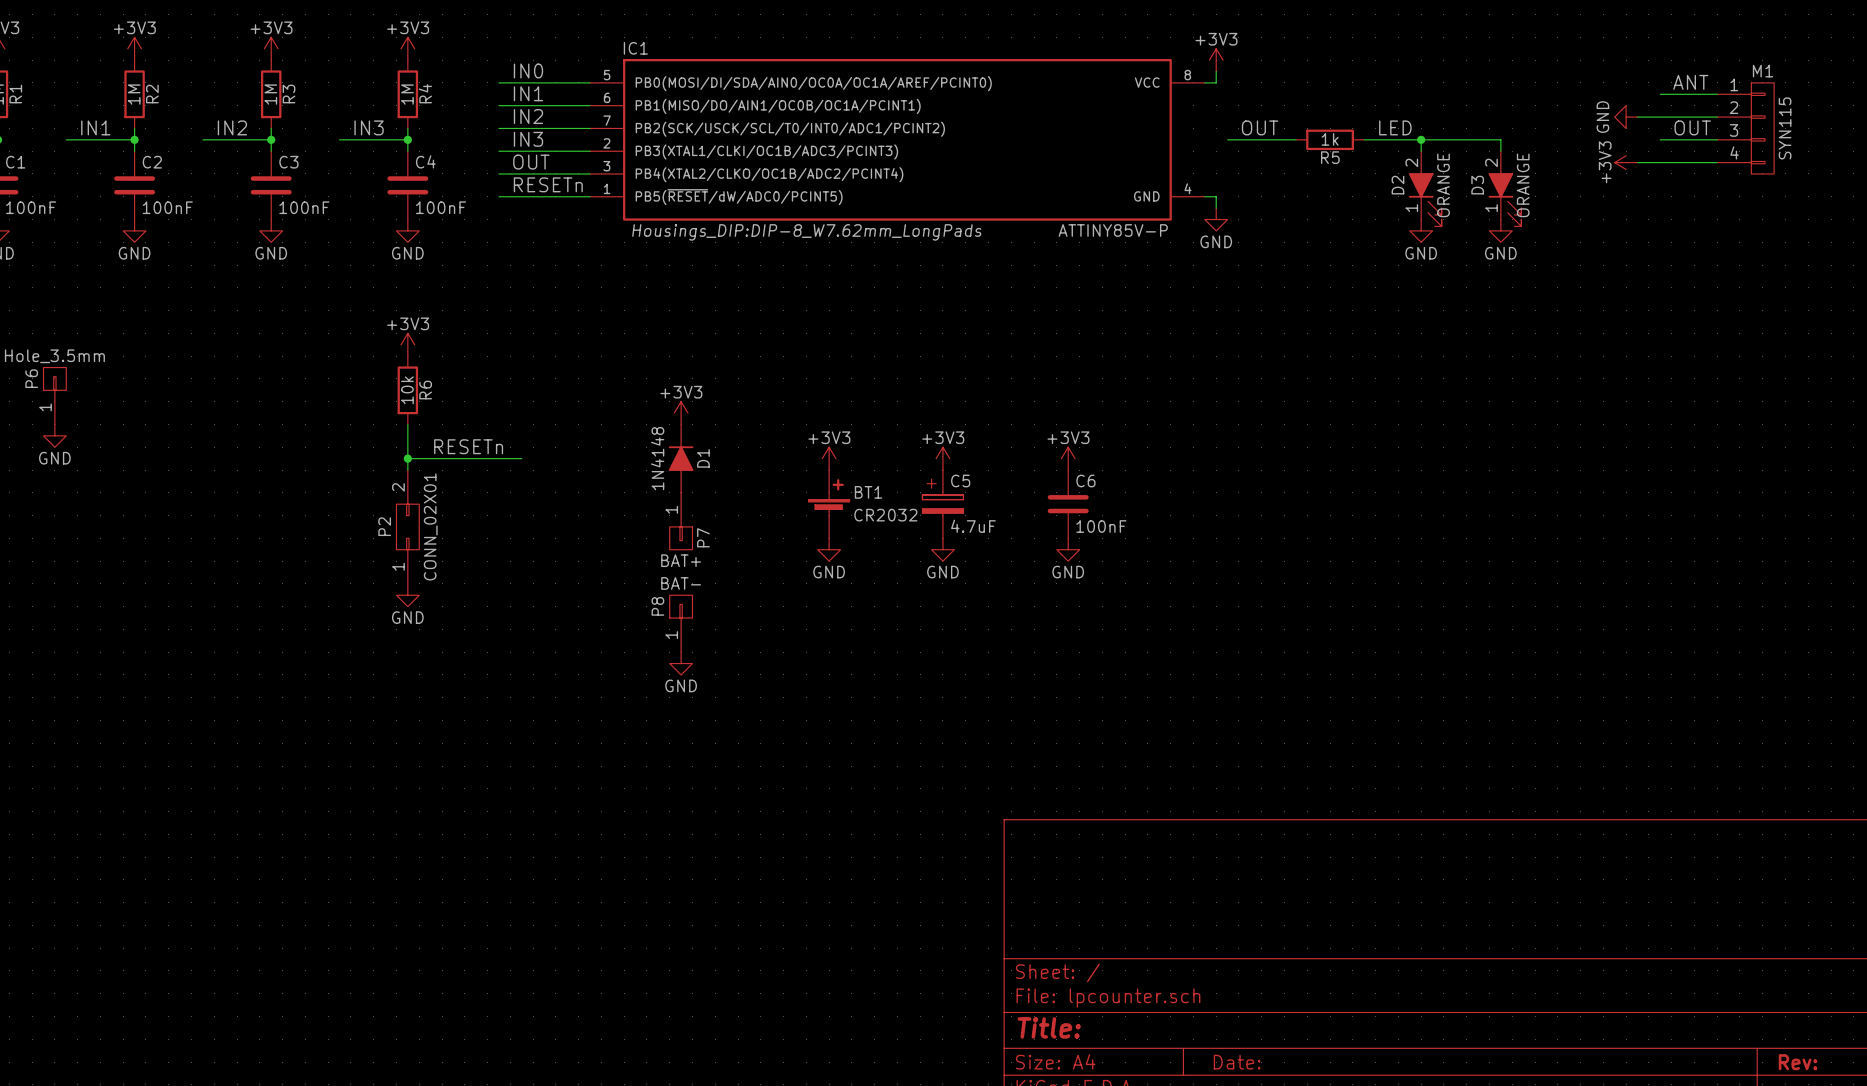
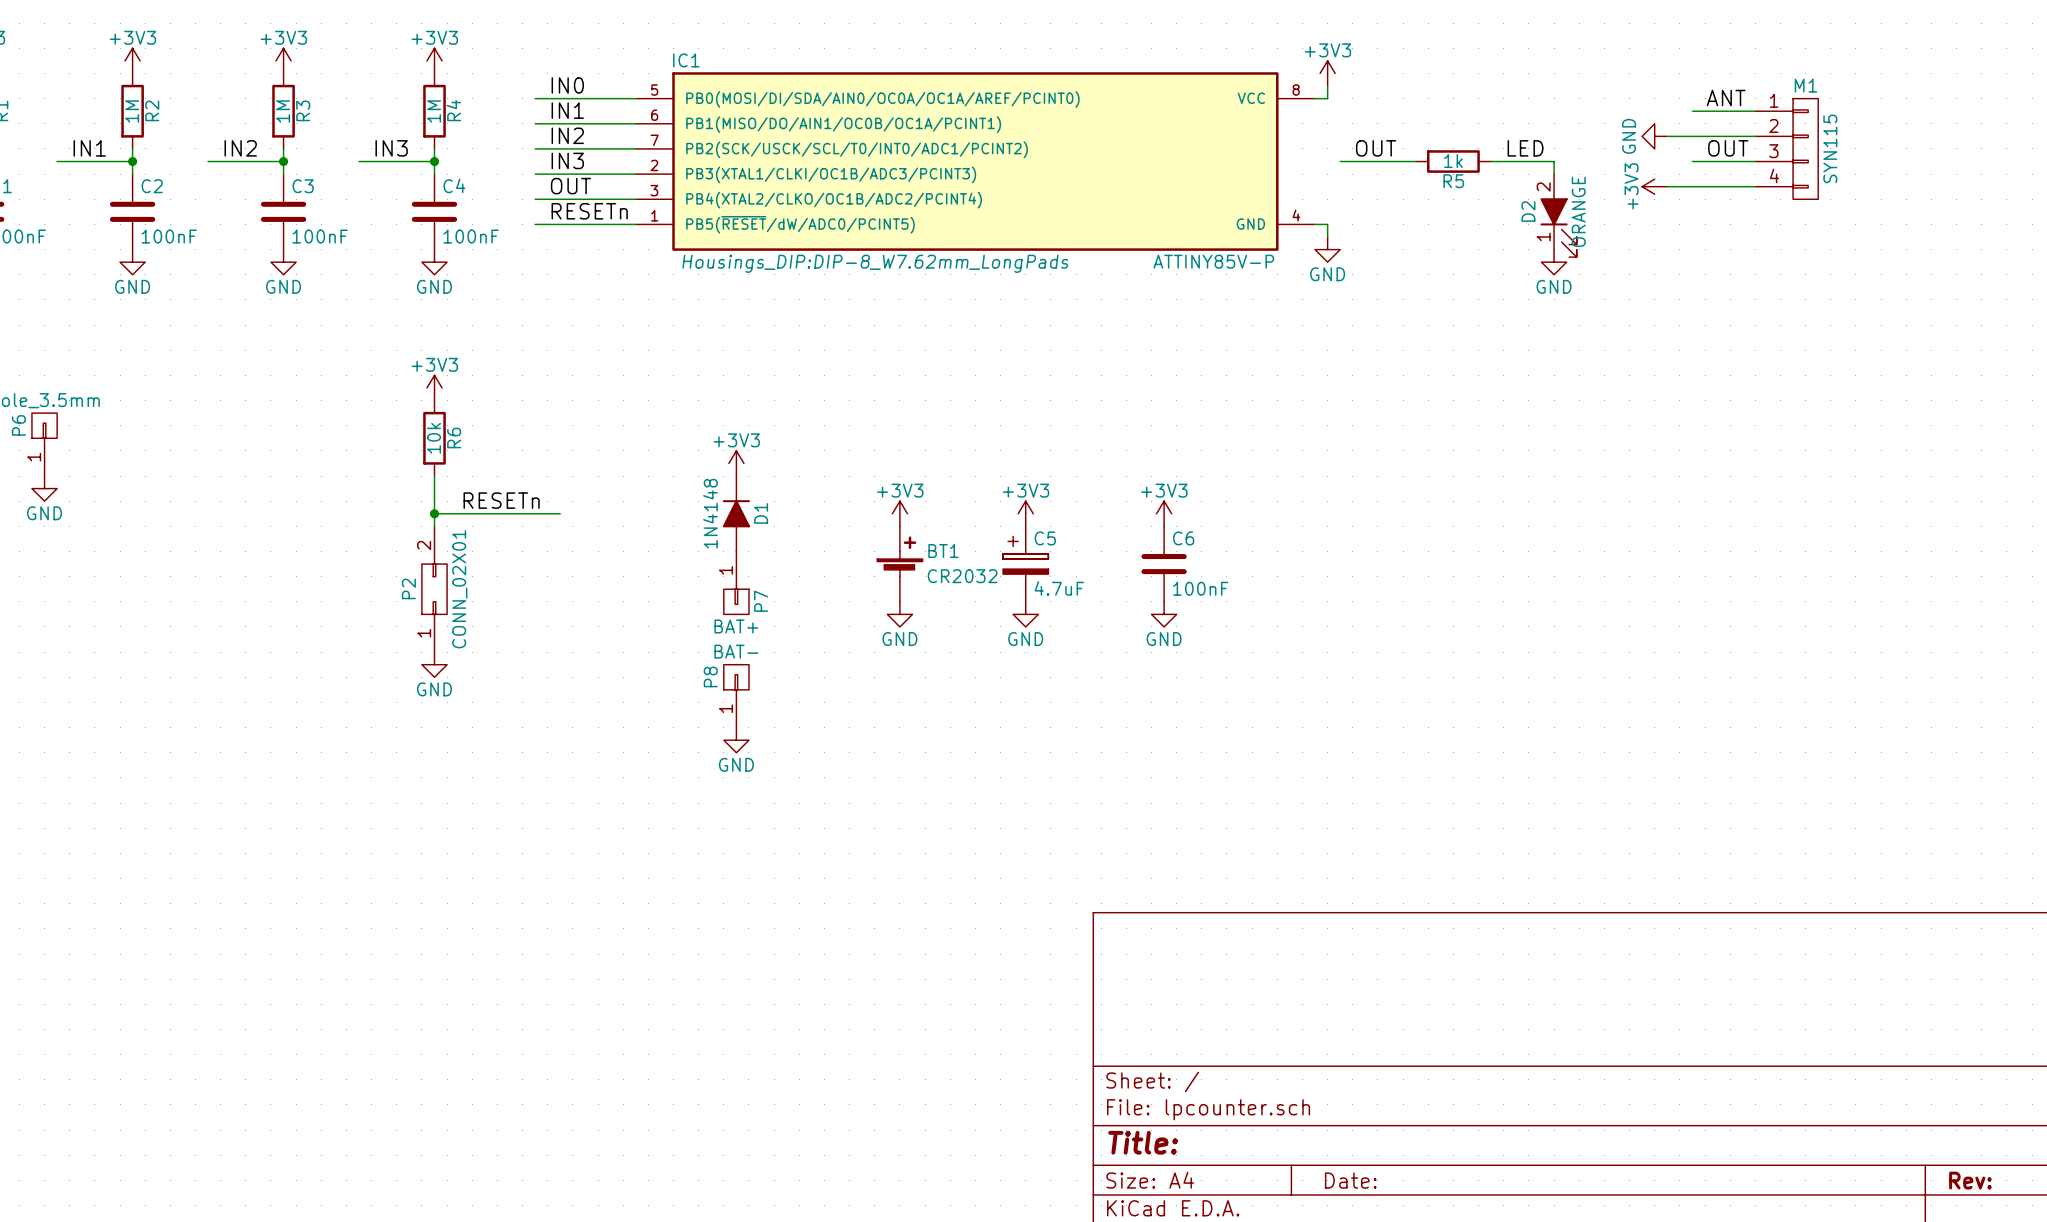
label position: ANT (1690, 82) -> ANT (1726, 98)
wire: (1660, 94) (1717, 94) -> (1692, 111) (1755, 111)
power symbol: none -> GND (1654, 136)
power symbol: GND (1626, 117) -> none
wire: (1637, 117) (1717, 117) -> (1667, 136) (1755, 136)
label position: OUT (1692, 127) -> OUT (1728, 148)
M1 position: (1745, 128) -> (1786, 148)
wire: (1421, 139) (1500, 139) (1500, 151) -> none
junction: (1421, 139) -> none
wire: (1660, 139) (1717, 139) -> (1692, 161) (1755, 161)
power symbol position: +3V3 (1626, 162) -> +3V3 (1654, 186)
wire: (1637, 162) (1717, 162) -> (1667, 186) (1755, 186)
D3: ORANGE (1504, 188) -> none
power symbol: GND (1500, 230) -> none

